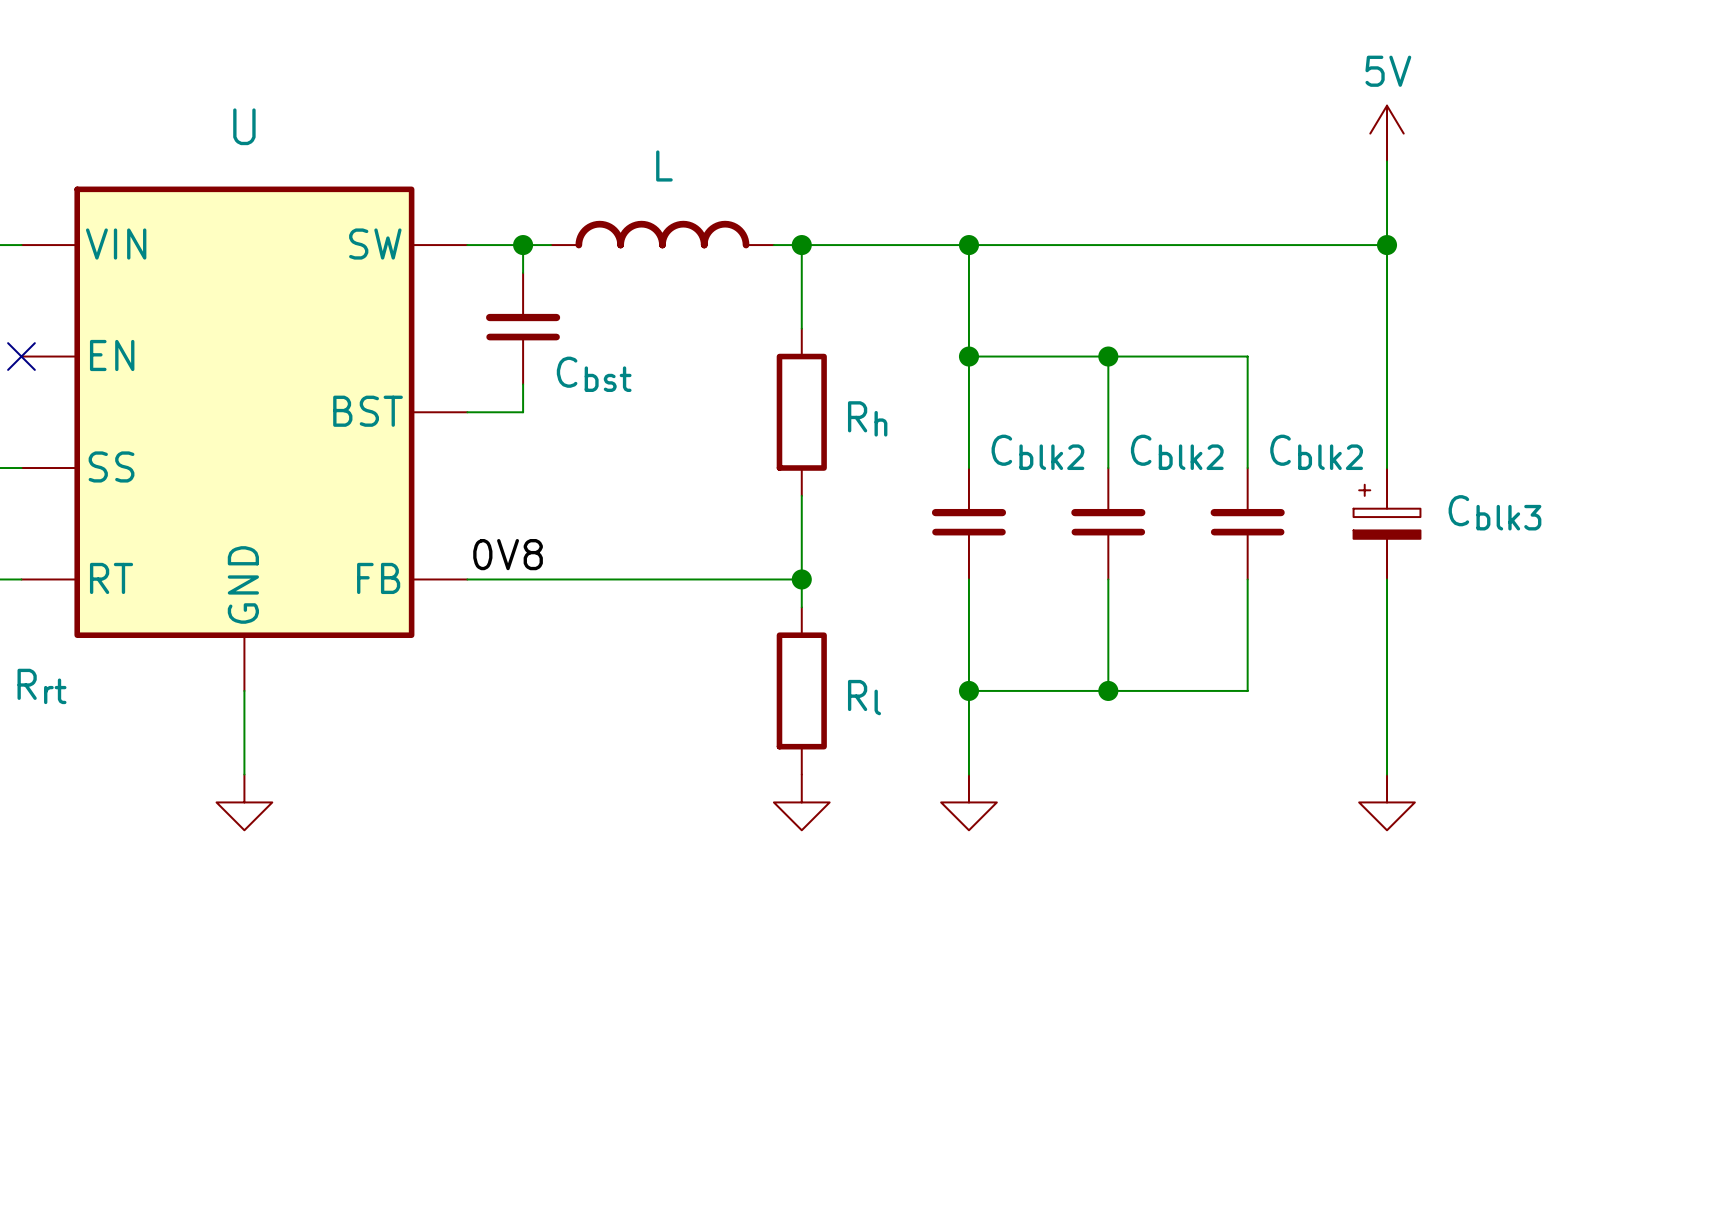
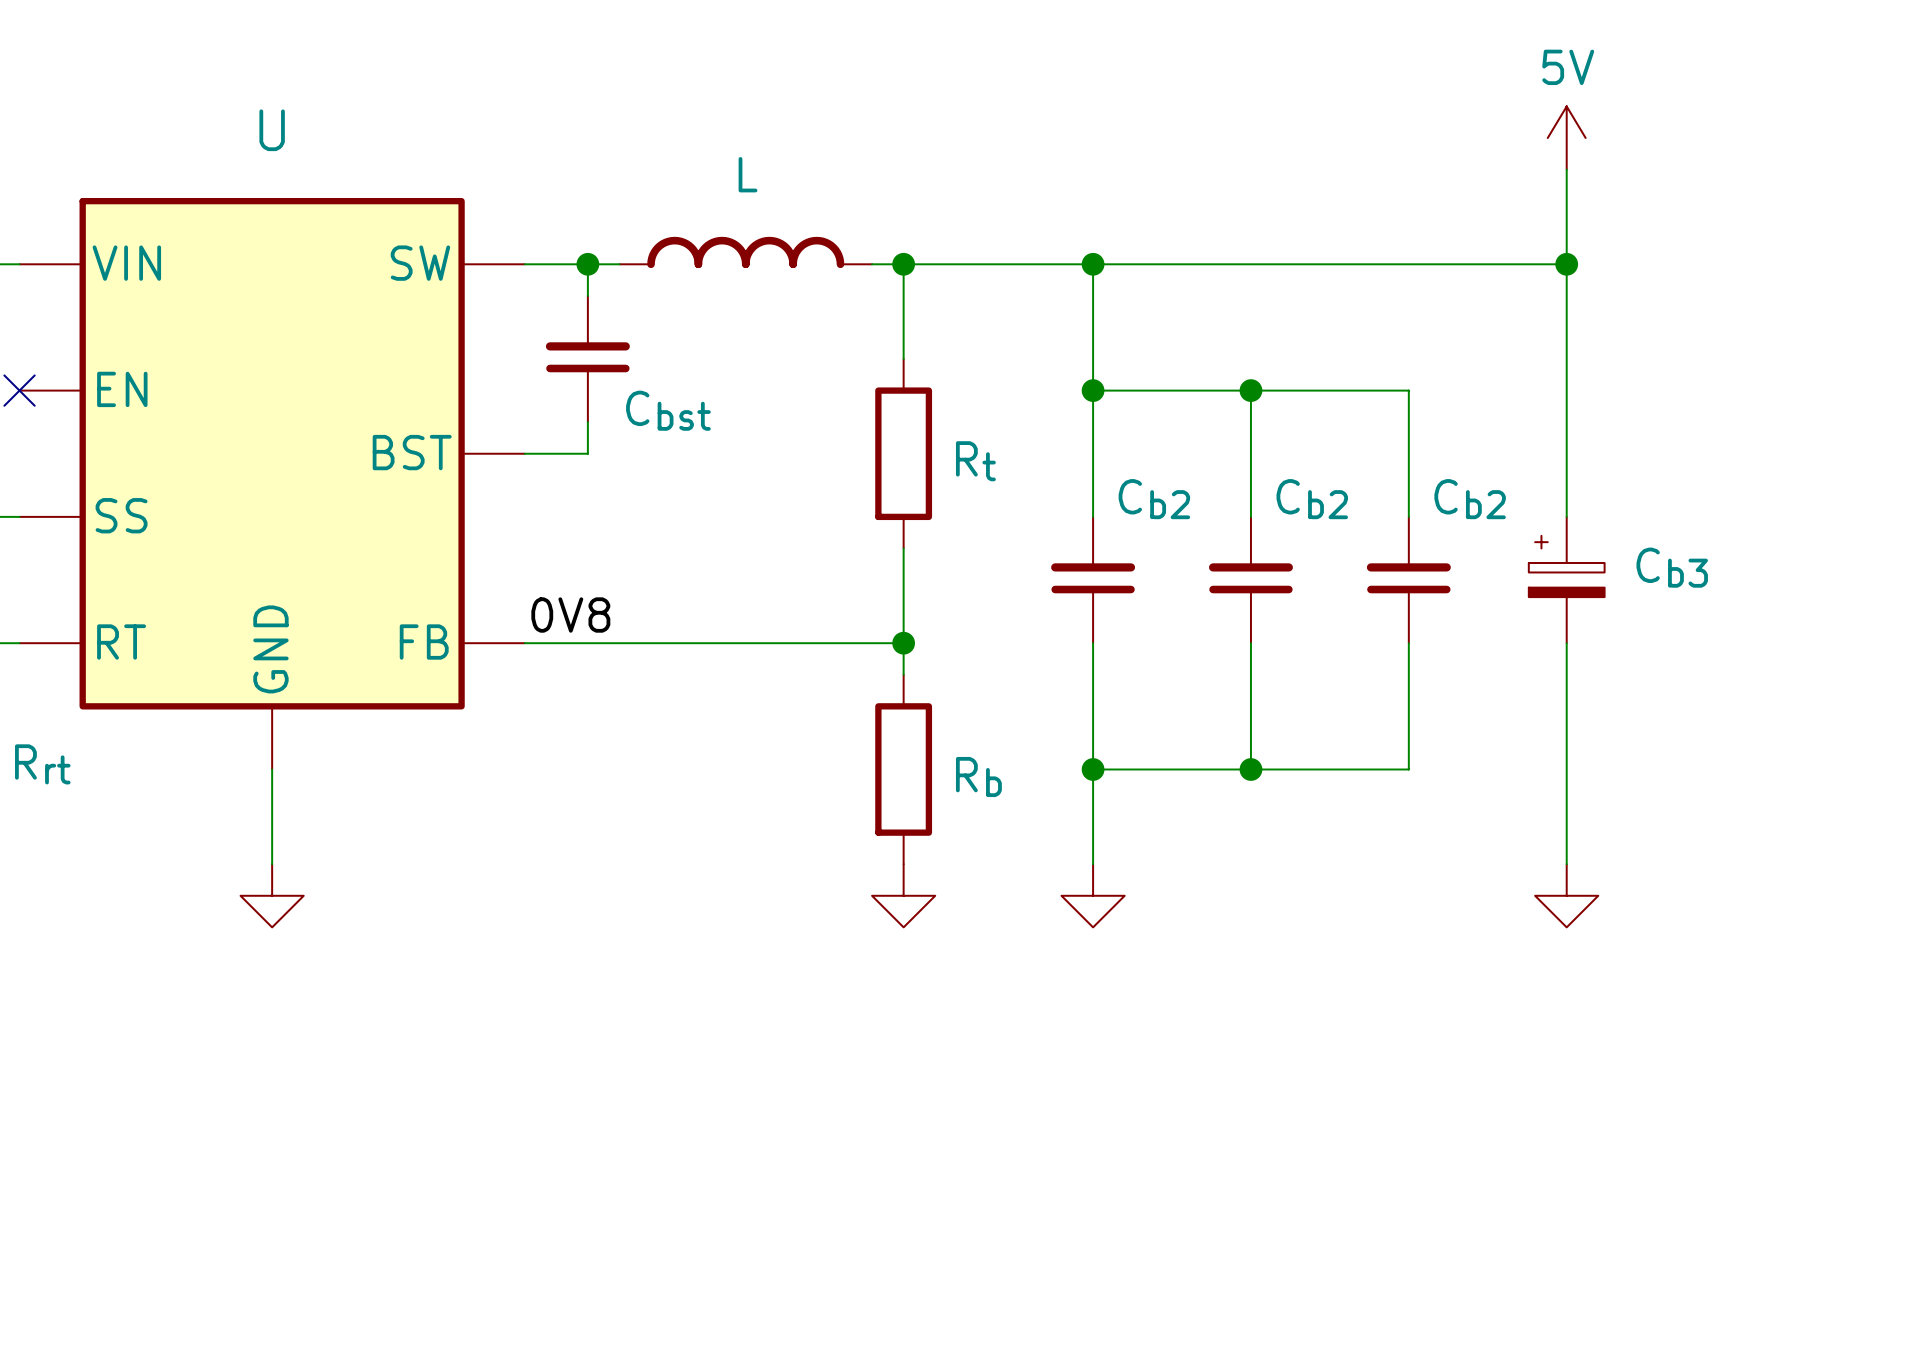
Rh name: Rh (867, 418) -> Rt (975, 461)
Cblk2 name: Cblk2 (1037, 452) -> Cb2 (1154, 499)
Cblk2 name: Cblk2 (1177, 452) -> Cb2 (1312, 499)
Cblk2 name: Cblk2 (1316, 452) -> Cb2 (1470, 499)
Cblk3 name: Cblk3 (1494, 512) -> Cb3 (1672, 567)
Rl name: Rl (864, 697) -> Rb (978, 777)

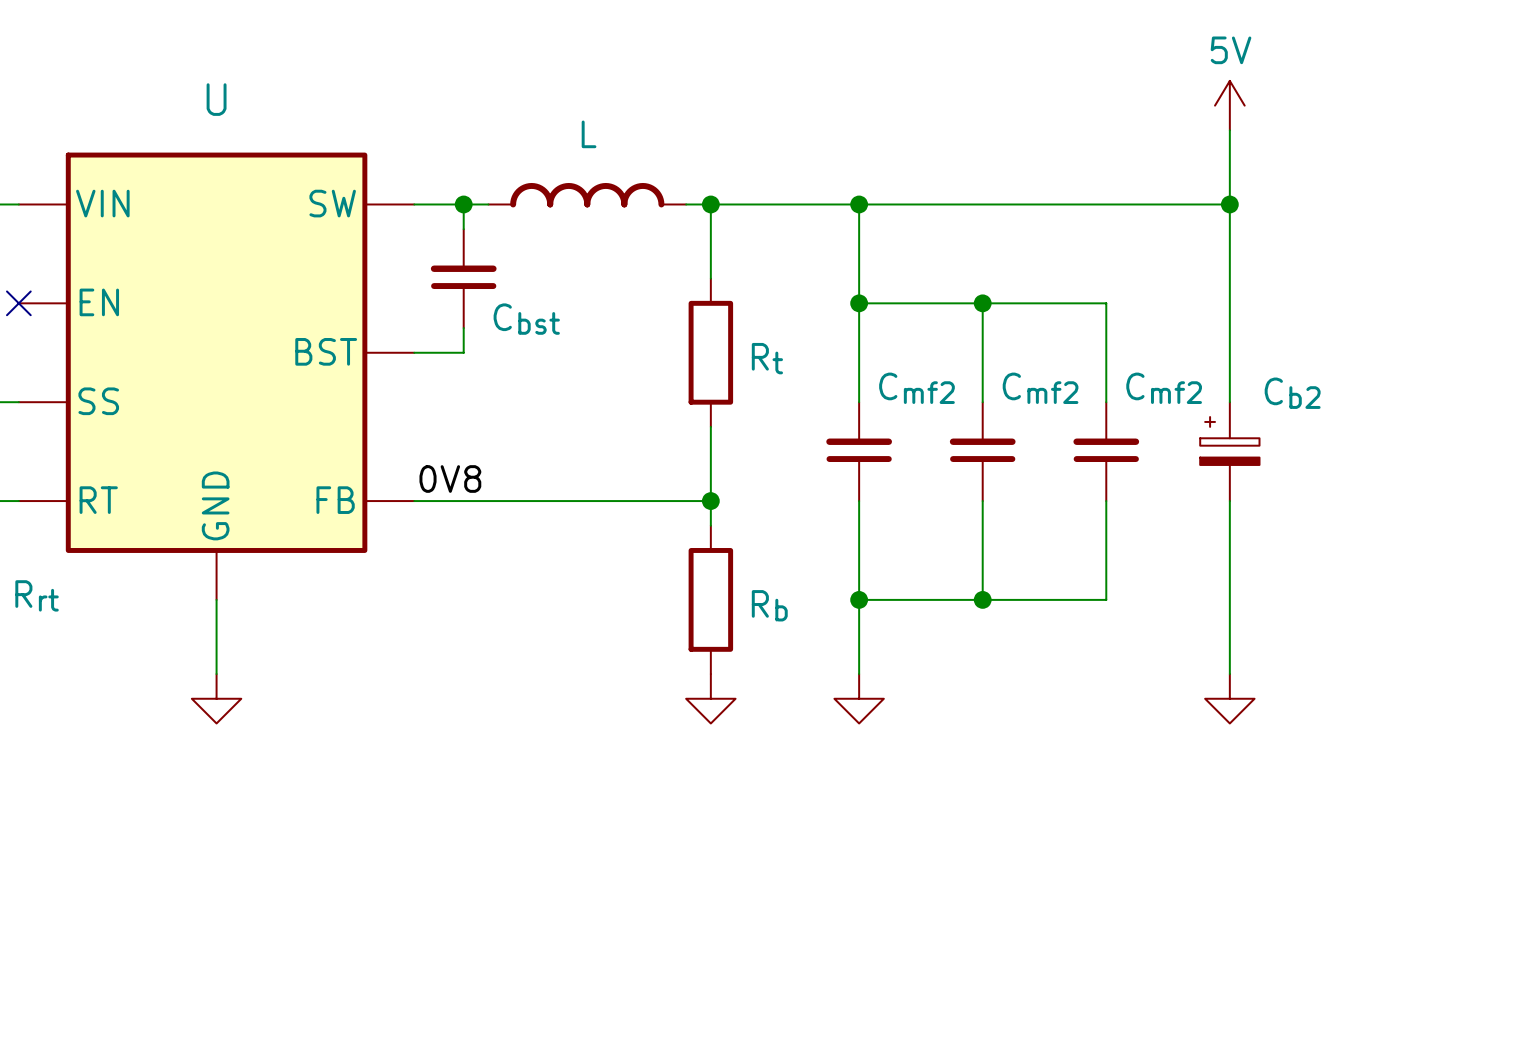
Cb2 name: Cb2 (1154, 499) -> Cmf2 (916, 388)
Cb2 name: Cb2 (1312, 499) -> Cmf2 (1040, 388)
Cb2 name: Cb2 (1470, 499) -> Cmf2 (1164, 388)
Cb3 name: Cb3 (1672, 567) -> Cb2 (1292, 393)

